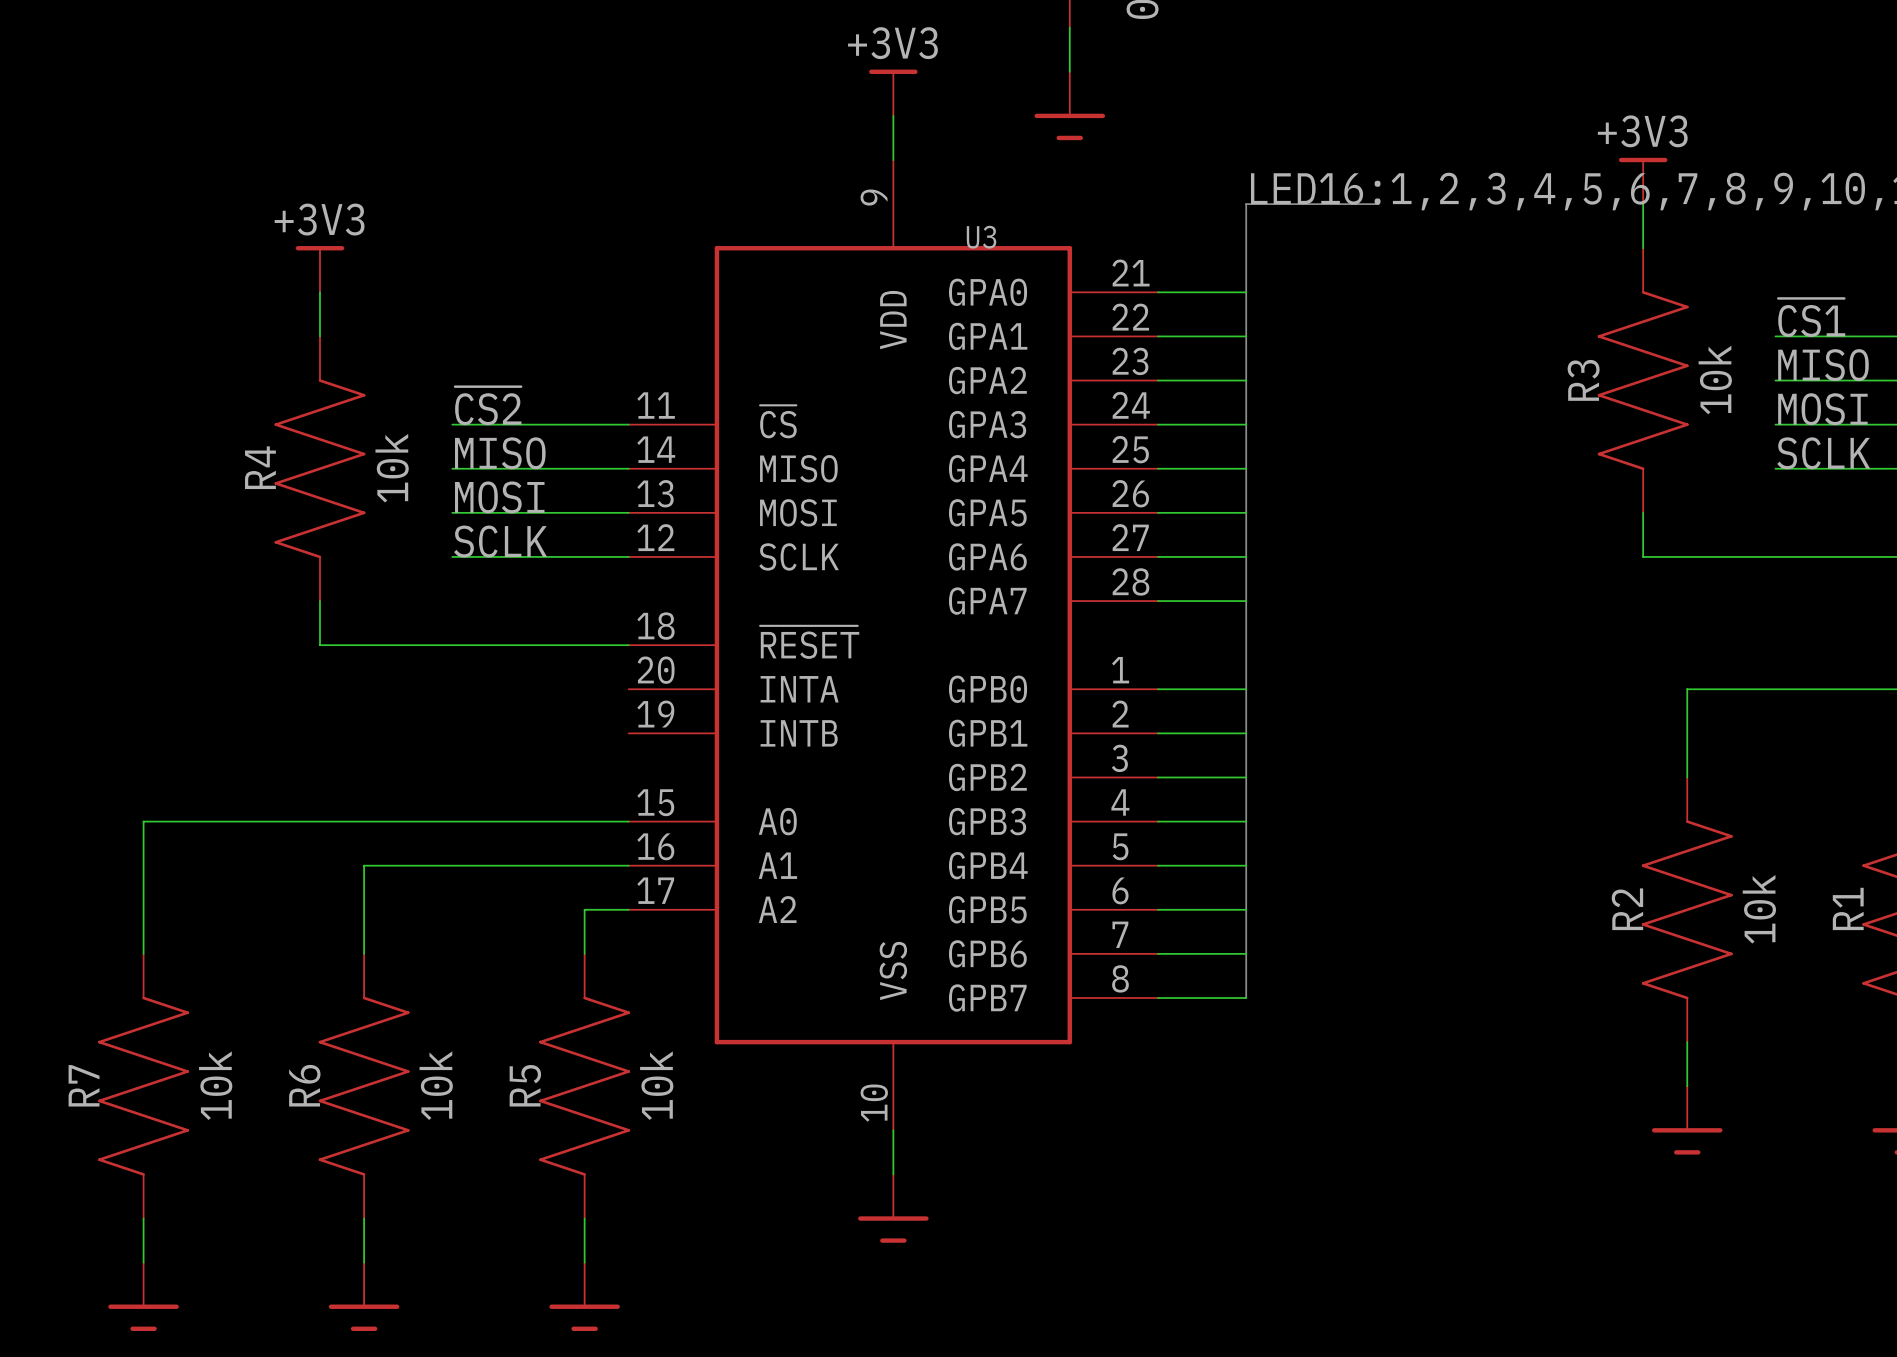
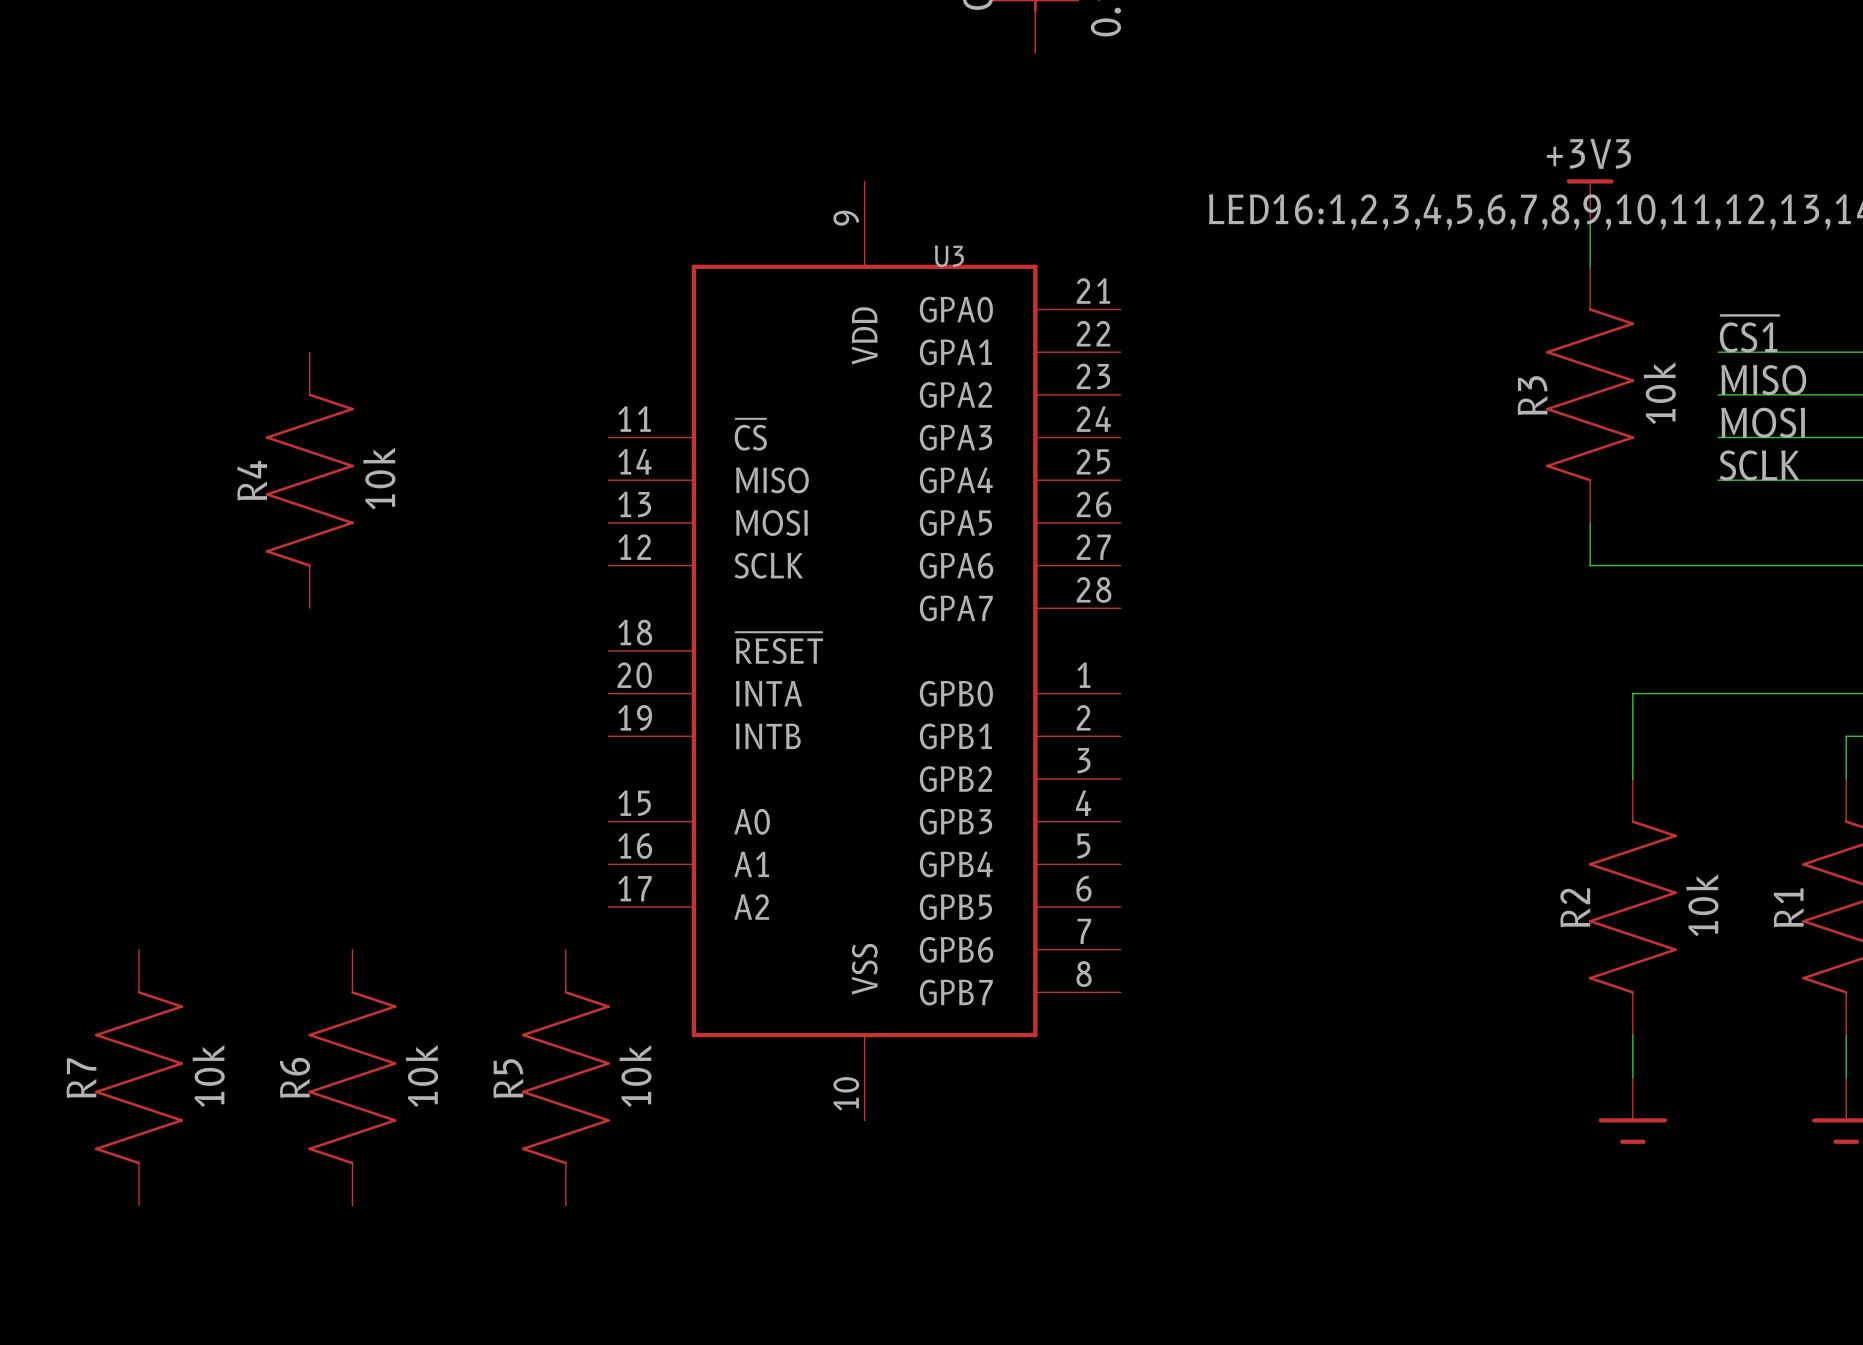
wire: (1069, 27) (1069, 71) -> none
power symbol: +3V3 (893, 92) -> none
power symbol: (1069, 105) -> none
wire: (893, 115) (893, 160) -> none
bus: (1378, 204) (1246, 204) (1246, 998) -> none
power symbol: +3V3 (319, 269) -> none
wire: (319, 292) (319, 336) -> none
wire: (1157, 292) (1246, 292) -> none
wire: (1157, 336) (1246, 336) -> none
wire: (1157, 380) (1246, 380) -> none
label: ~{CS2} (488, 405) -> none
wire: (452, 424) (628, 424) -> none
wire: (1157, 424) (1246, 424) -> none
label: MISO (500, 453) -> none
wire: (452, 468) (628, 468) -> none
wire: (1157, 468) (1246, 468) -> none
label: MOSI (499, 497) -> none
wire: (452, 512) (628, 512) -> none
wire: (1157, 512) (1246, 512) -> none
label: SCLK (500, 541) -> none
wire: (452, 556) (628, 556) -> none
wire: (1157, 556) (1246, 556) -> none
wire: (319, 601) (319, 645) (628, 645) -> none
wire: (1157, 601) (1246, 601) -> none
wire: (1157, 689) (1246, 689) -> none
wire: (1157, 733) (1246, 733) -> none
wire: (1157, 777) (1246, 777) -> none
wire: (628, 821) (143, 821) (143, 953) -> none
wire: (1157, 821) (1246, 821) -> none
wire: (628, 865) (364, 865) (364, 953) -> none
wire: (1157, 865) (1246, 865) -> none
wire: (628, 909) (584, 909) (584, 953) -> none
wire: (1157, 909) (1246, 909) -> none
wire: (1157, 953) (1246, 953) -> none
wire: (1157, 998) (1246, 998) -> none
wire: (893, 1130) (893, 1174) -> none
power symbol: (893, 1208) -> none
wire: (143, 1218) (143, 1262) -> none
wire: (364, 1218) (364, 1262) -> none
wire: (584, 1218) (584, 1262) -> none
power symbol: (143, 1296) -> none
power symbol: (364, 1296) -> none
power symbol: (584, 1296) -> none

